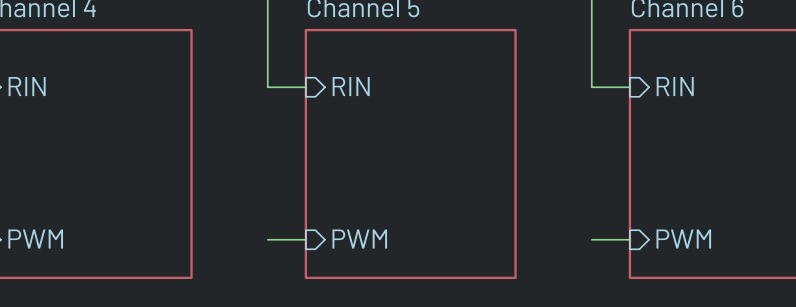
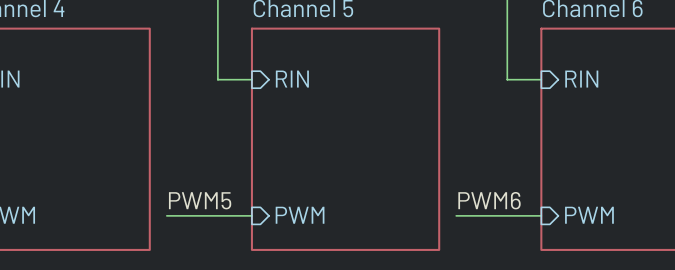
label: none -> PWM5 (200, 200)
label: none -> PWM6 (489, 200)
wire: none -> (166, 215) (217, 215)
wire: none -> (456, 215) (507, 215)

